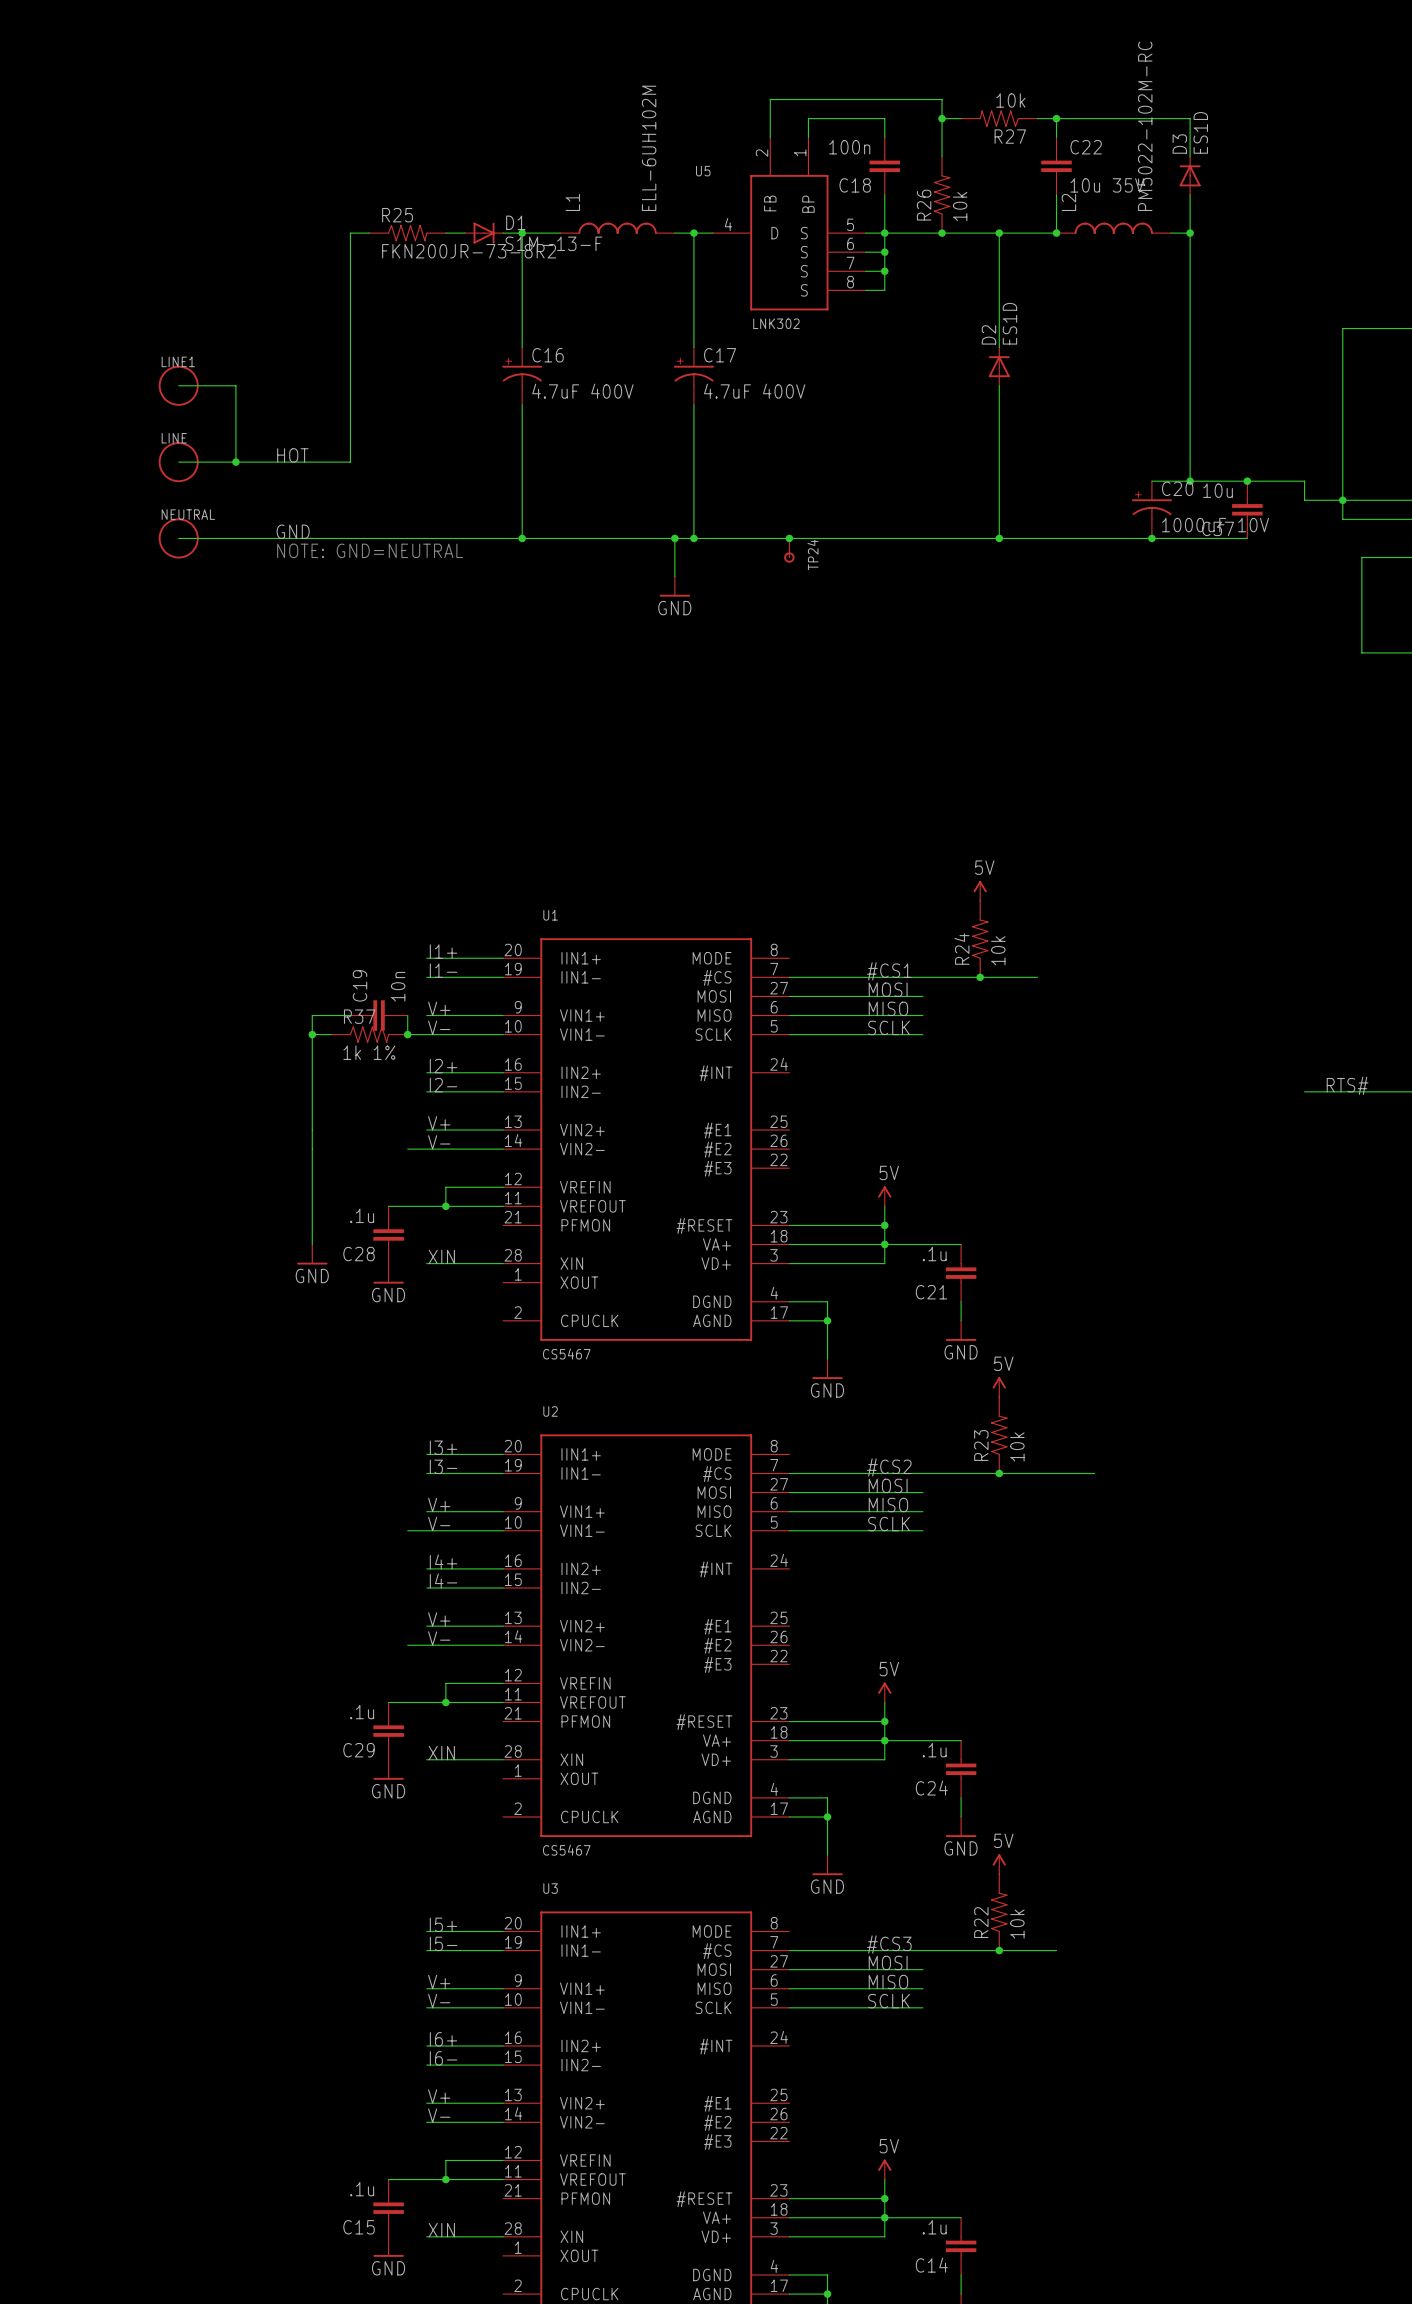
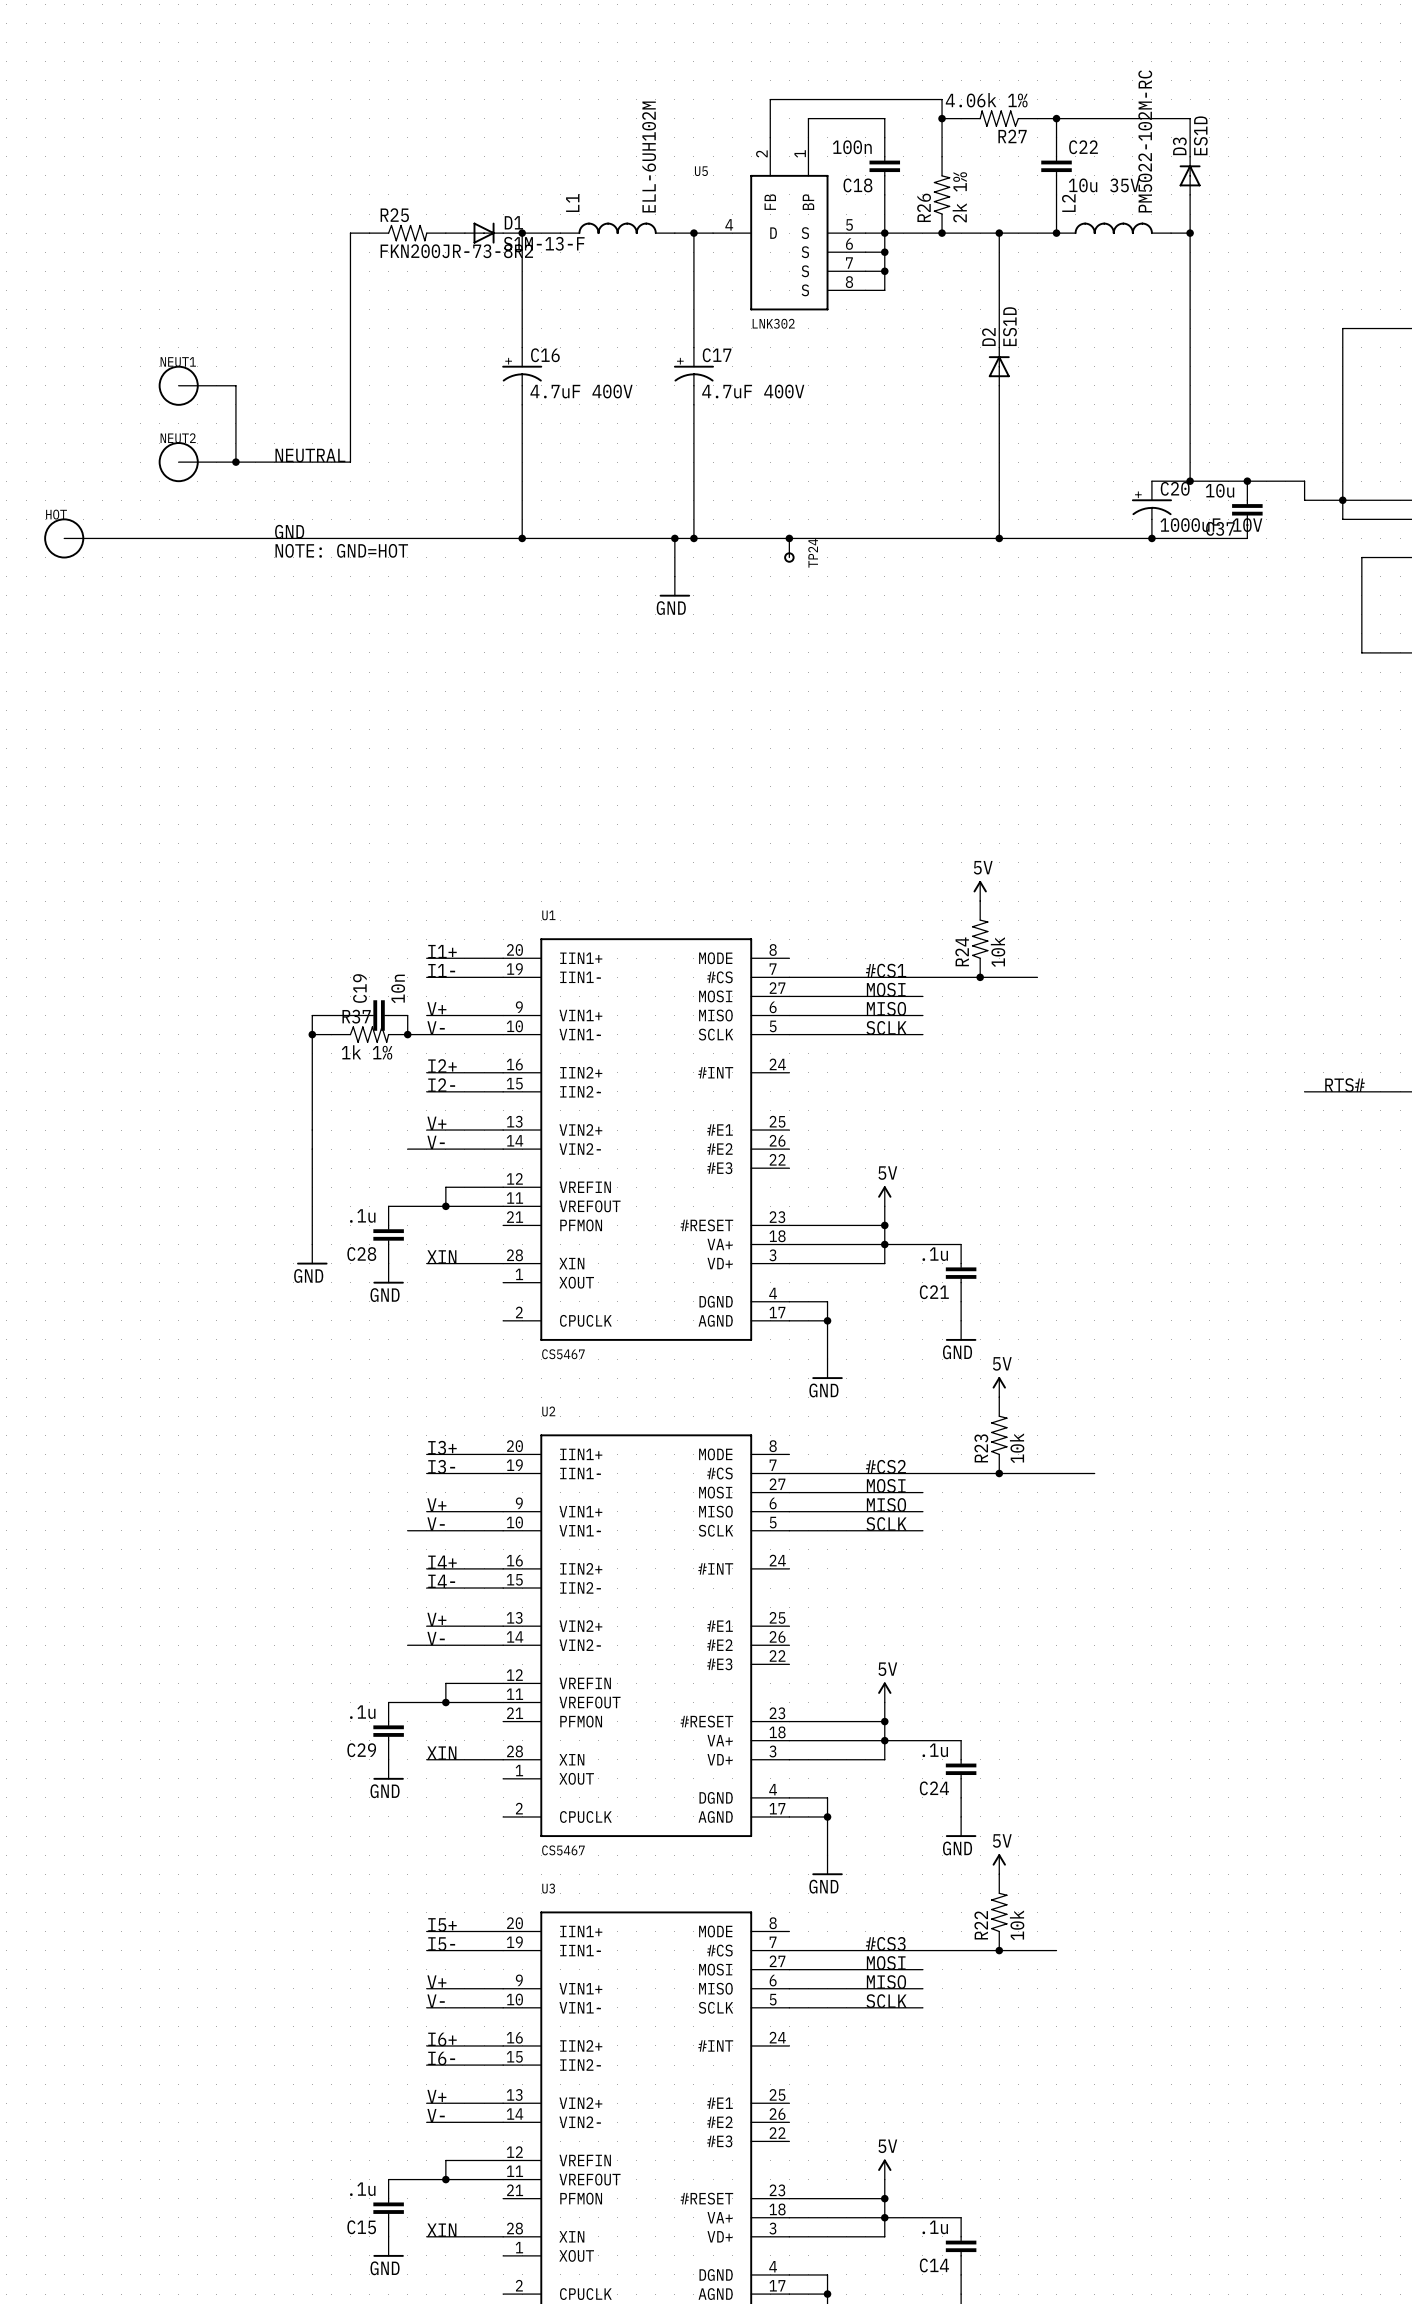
R27 value: 10k (1010, 100) -> 4.06k 1% (986, 100)
R26 value: 10k (960, 206) -> 2k 1% (959, 197)
LINE1 name: LINE1 (178, 361) -> NEUT1 (178, 362)
LINE name: LINE (174, 438) -> NEUT2 (178, 438)
label: HOT (292, 455) -> NEUTRAL (310, 455)
wire: none -> (64, 538) (178, 538)
HOT: none -> (64, 538)
NEUTRAL: (178, 538) -> none
text: NOTE: GND=NEUTRAL (370, 550) -> NOTE: GND=HOT (341, 550)

